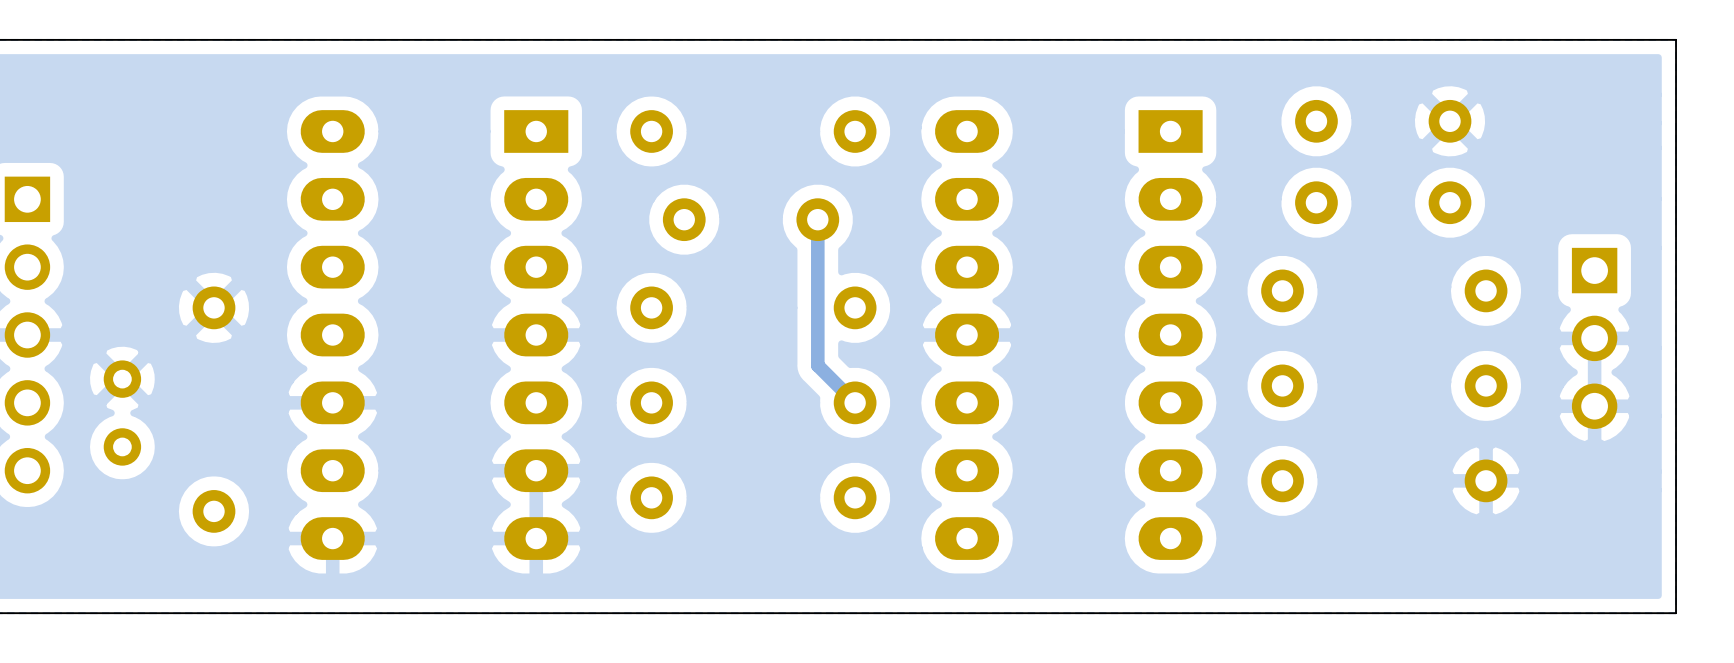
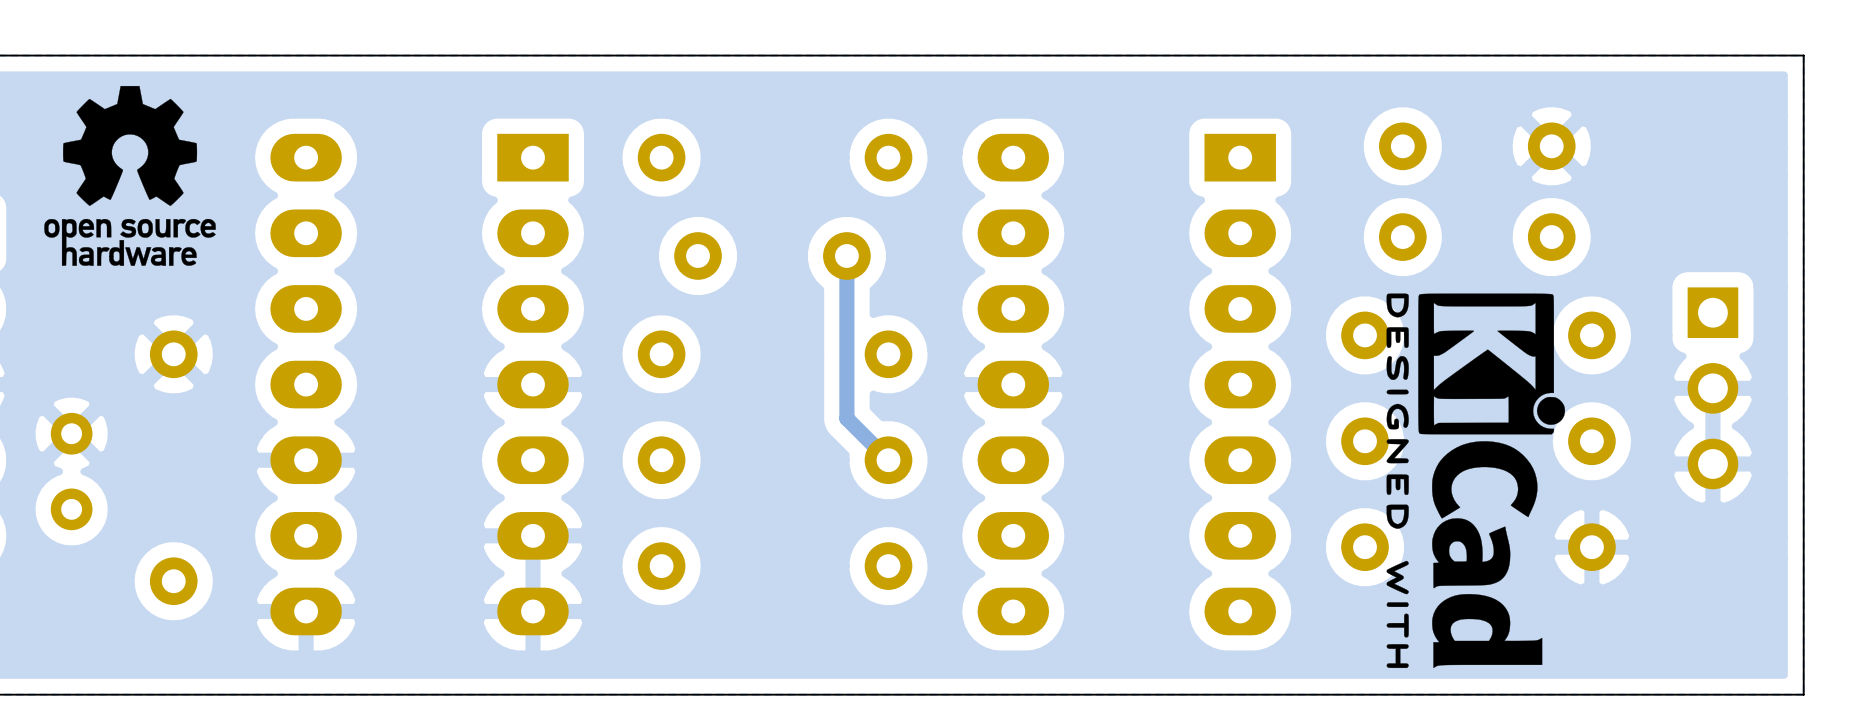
drawing: none -> [44, 85, 216, 266]
drawing: none -> [1386, 293, 1566, 669]

